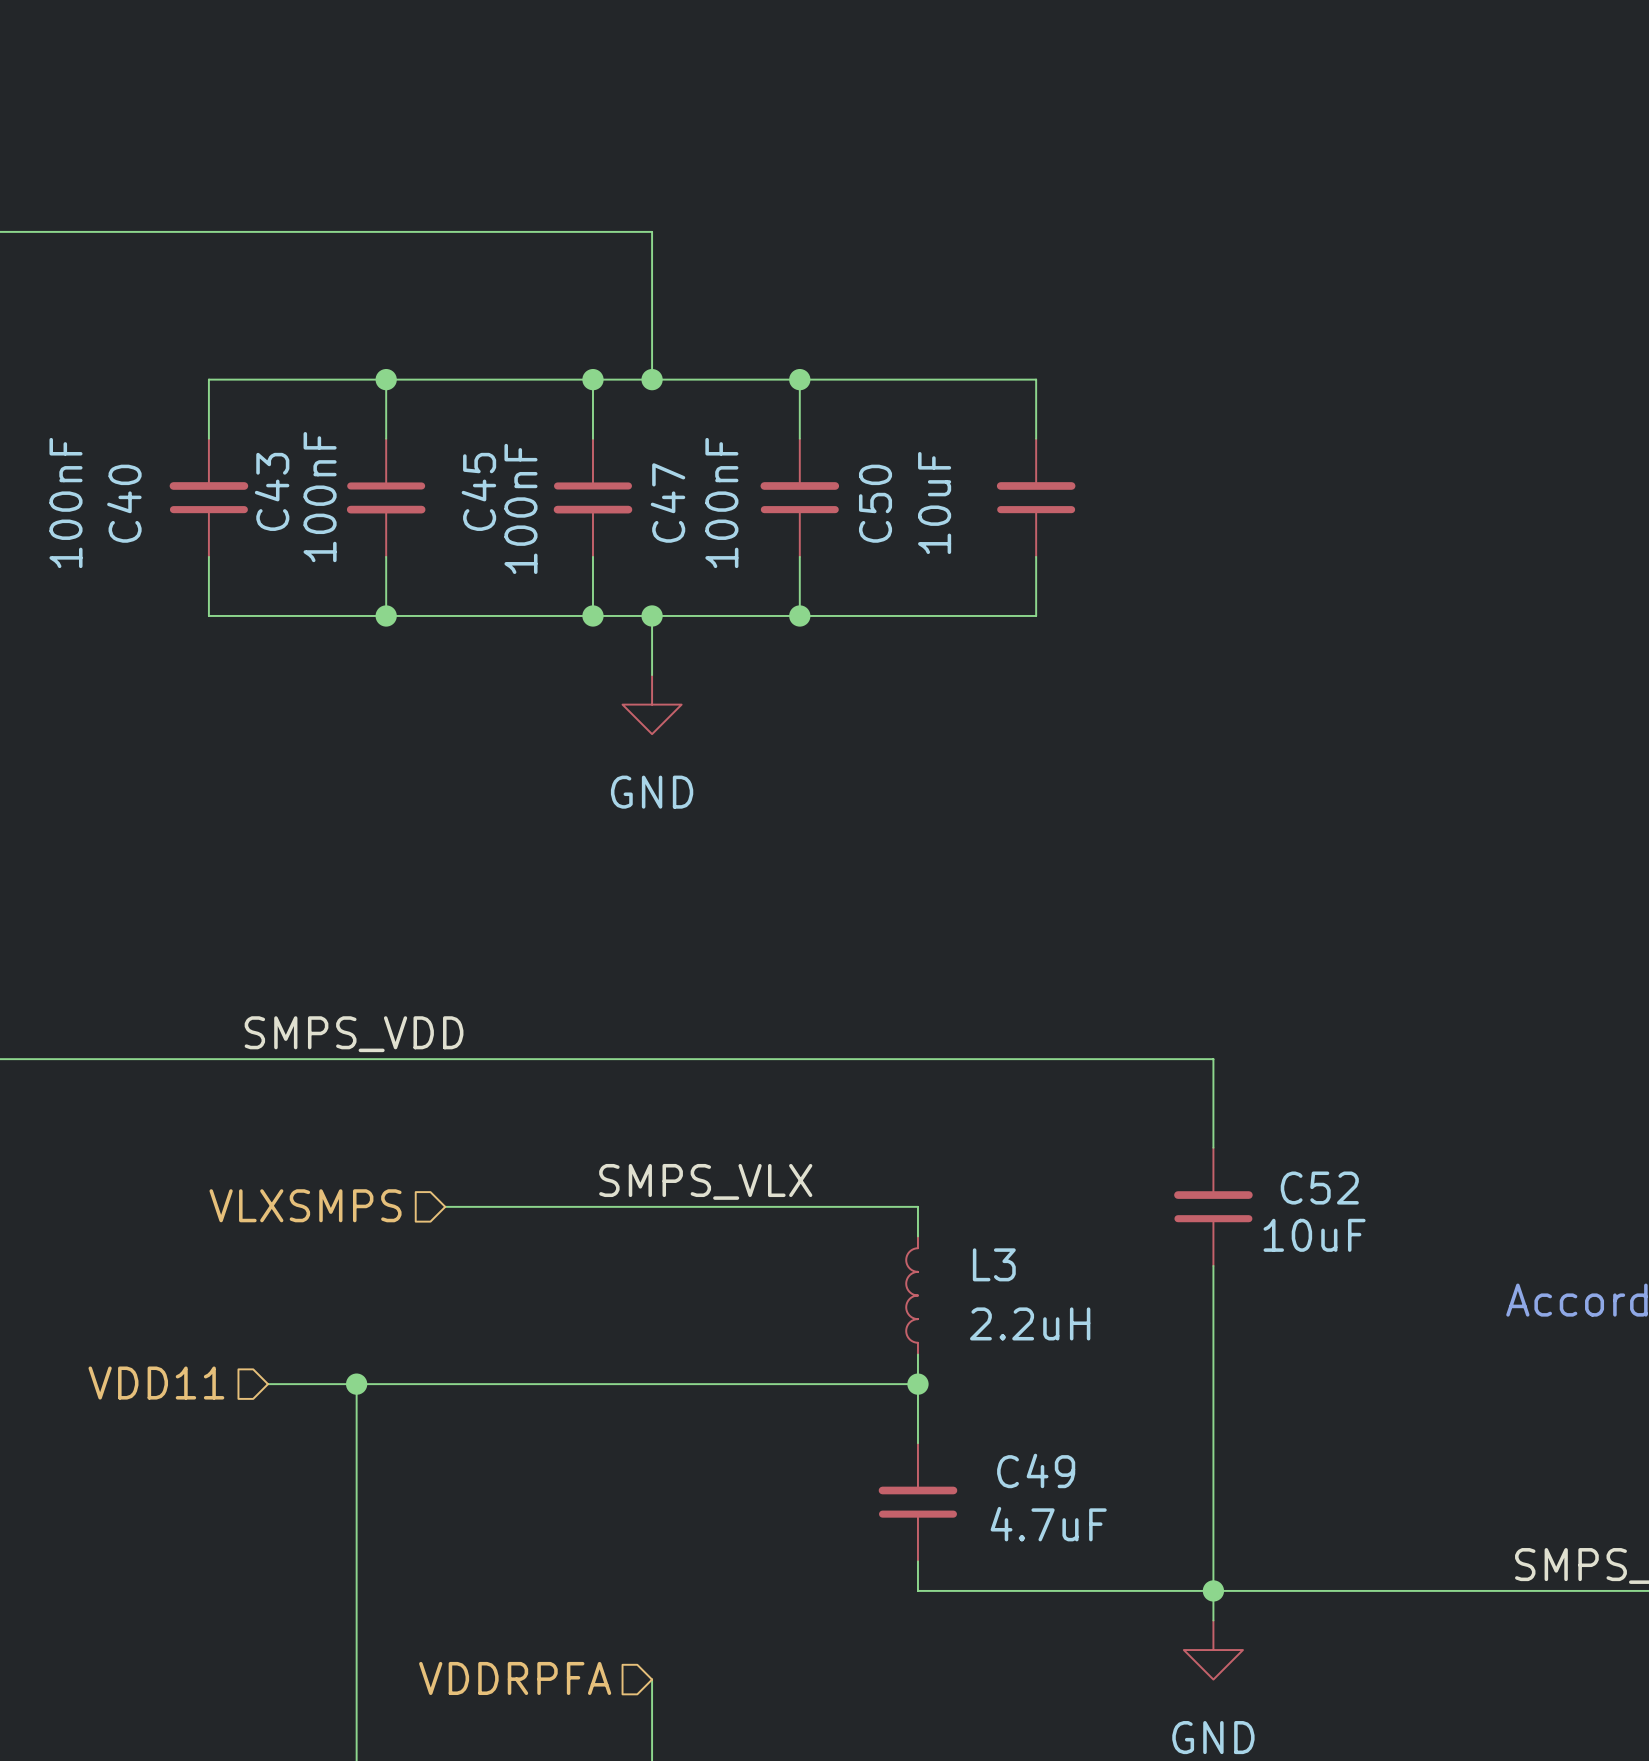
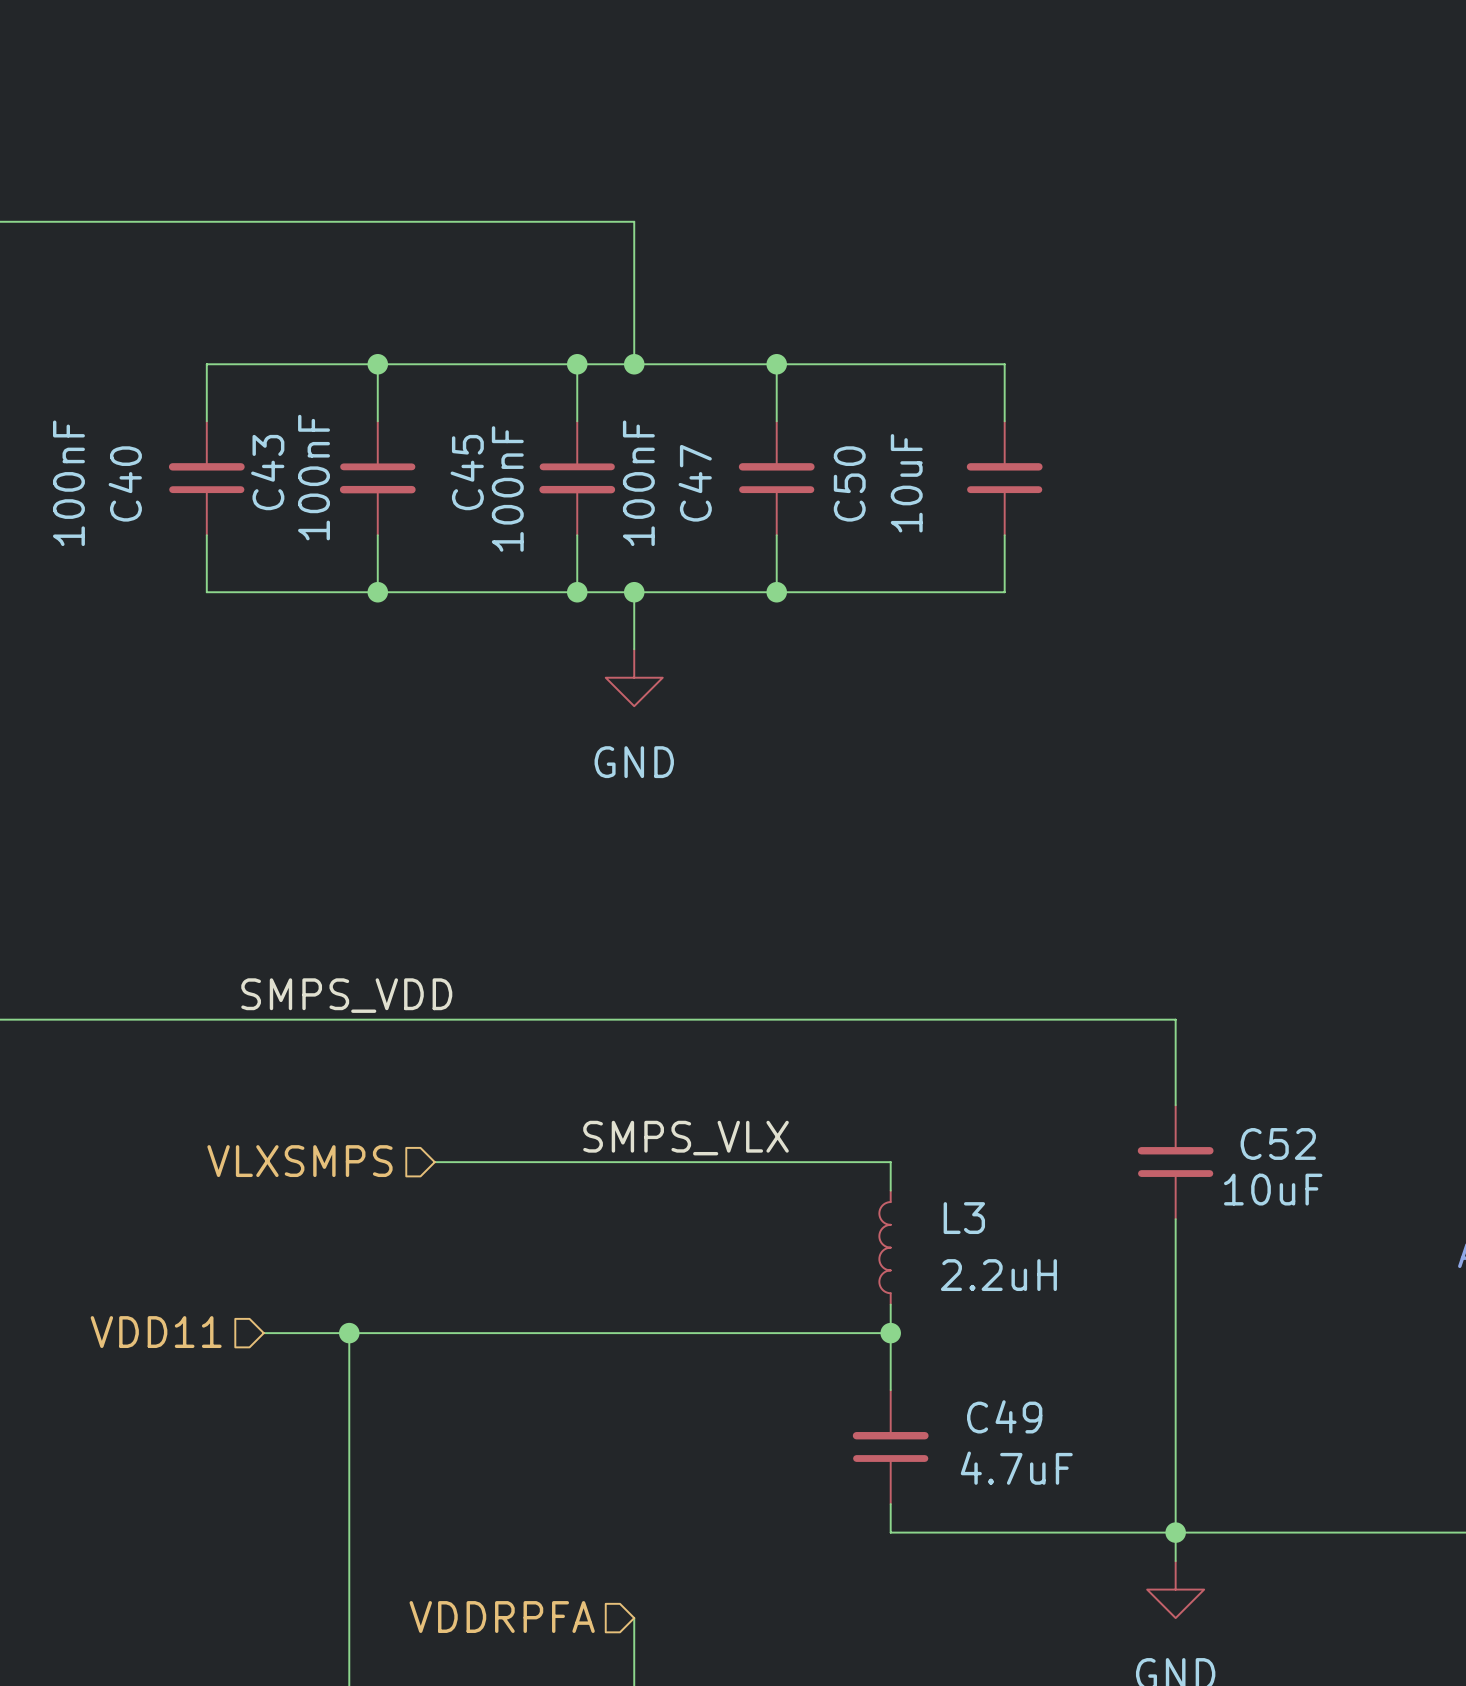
C47 name position: C47 (668, 503) -> C47 (695, 483)
C47 value position: 100nF (721, 503) -> 100nF (638, 483)

